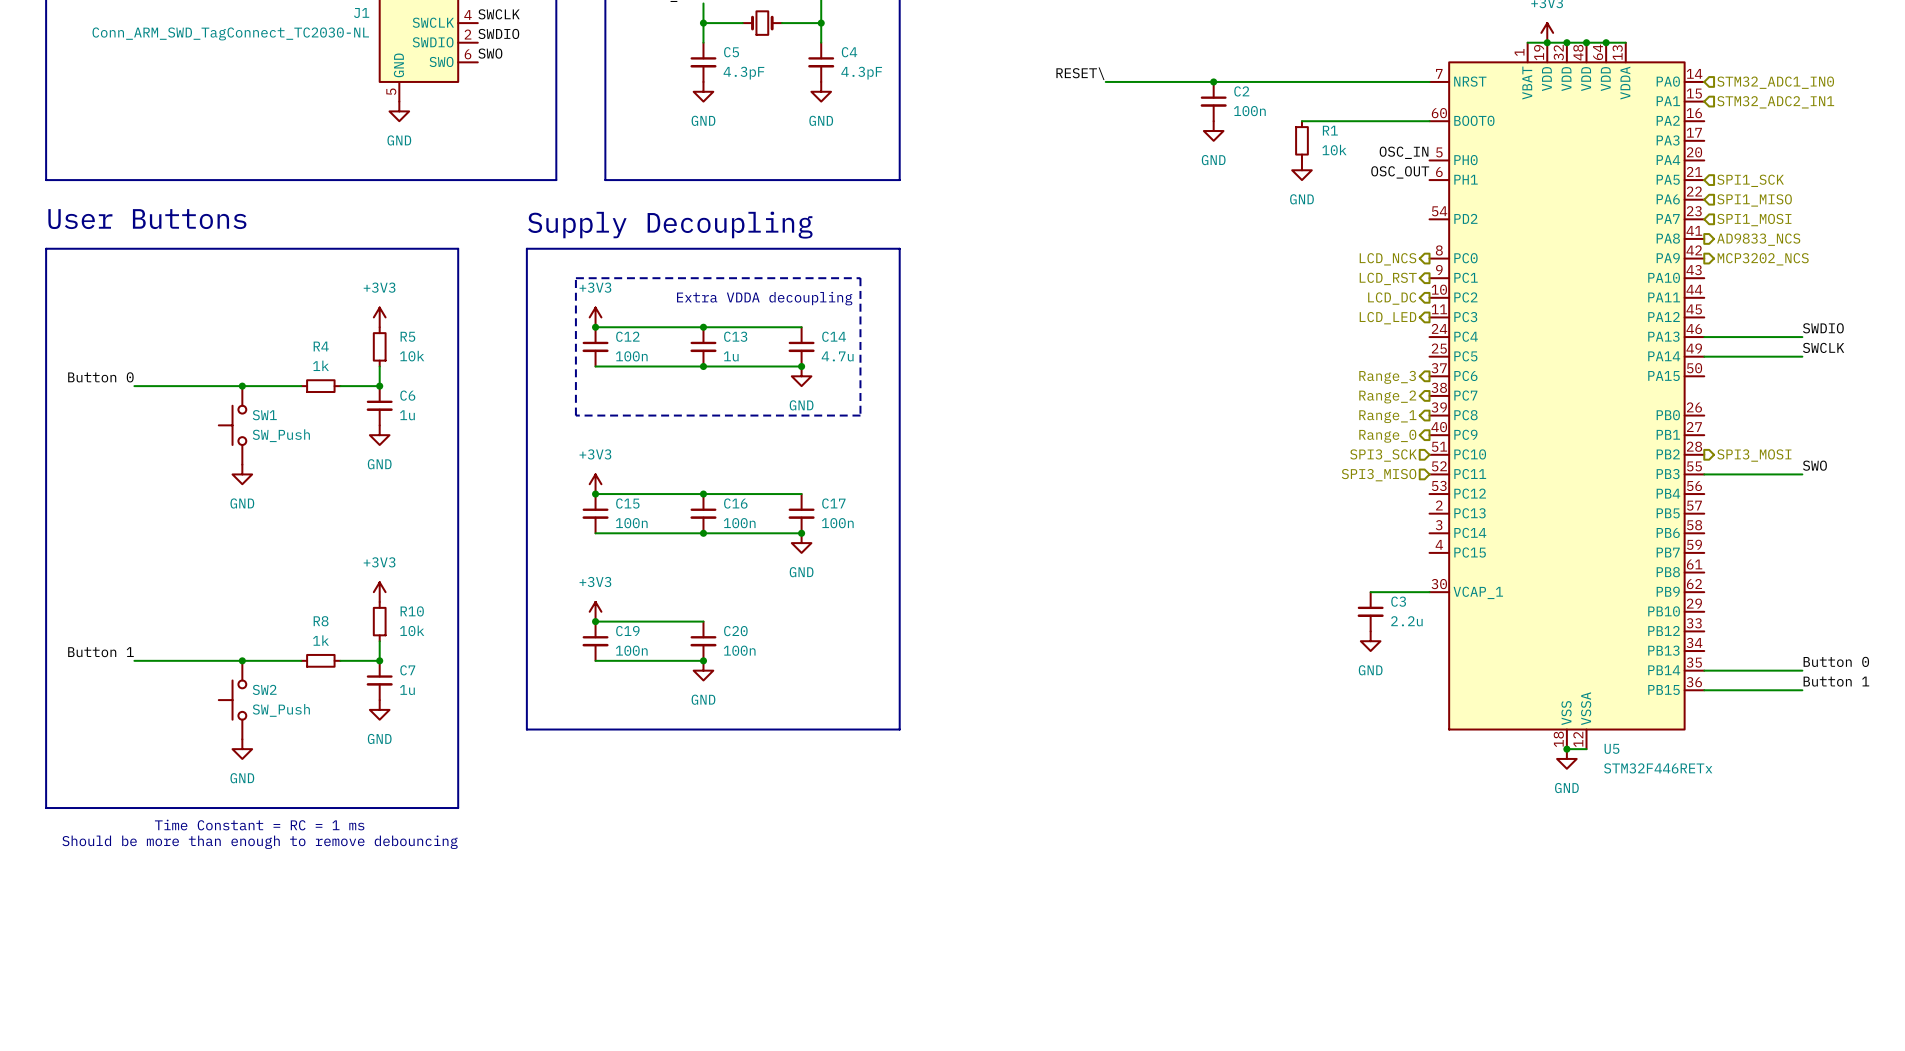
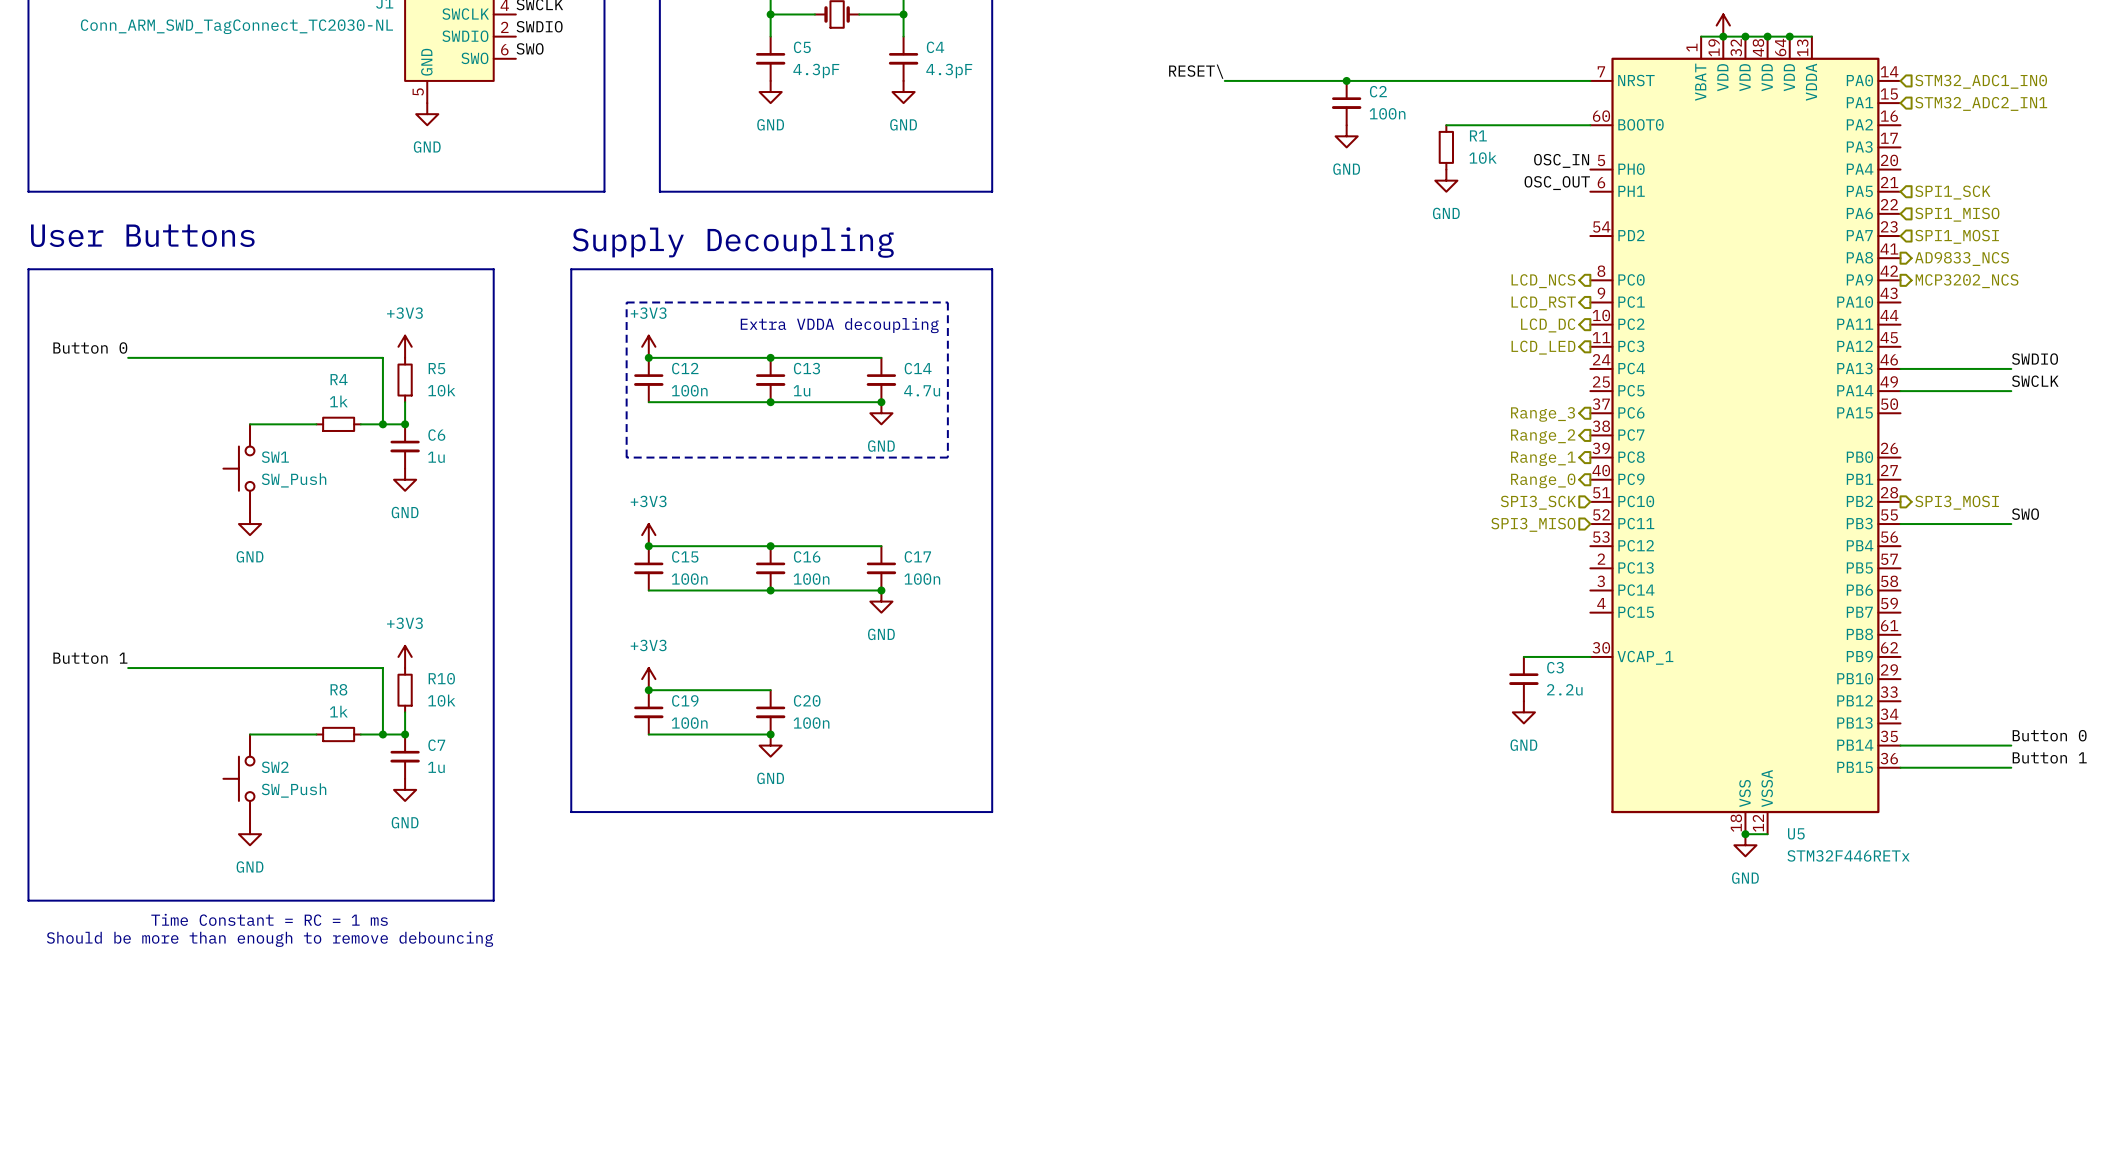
wire: none -> (128, 357) (382, 357) (382, 424)
label position: Button 0 (100, 377) -> Button 0 (90, 347)
wire: (134, 386) (242, 386) -> none
junction: (242, 386) -> none
junction: none -> (382, 424)
wire: none -> (128, 668) (382, 668) (382, 734)
label position: Button 1 (100, 652) -> Button 1 (90, 658)
wire: (134, 660) (242, 660) -> none
junction: (242, 660) -> none
junction: none -> (382, 734)

